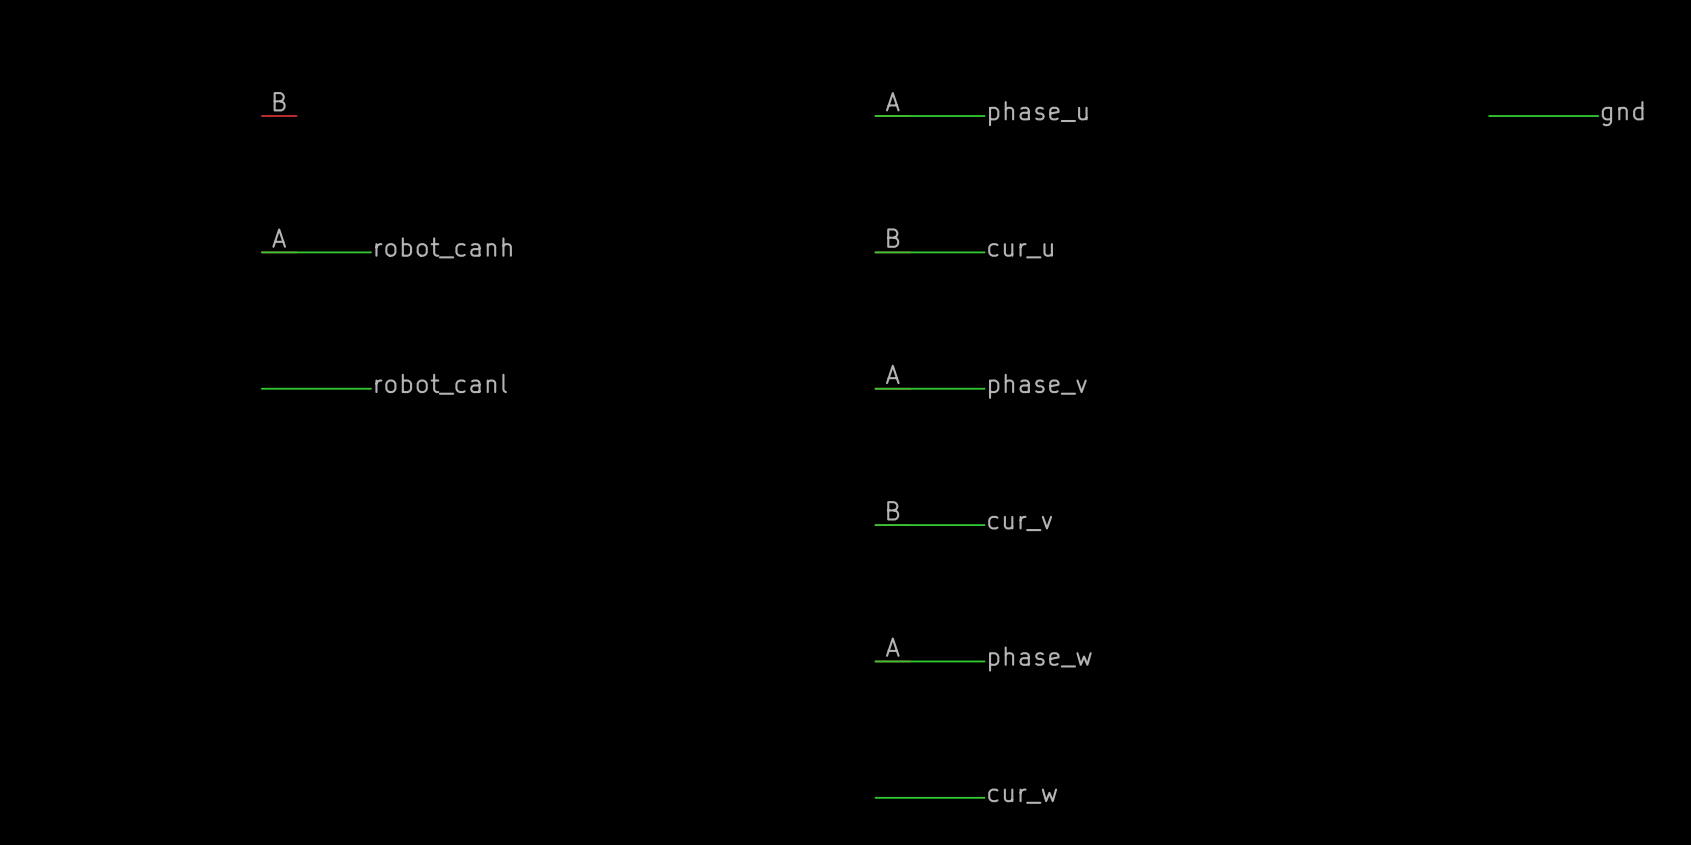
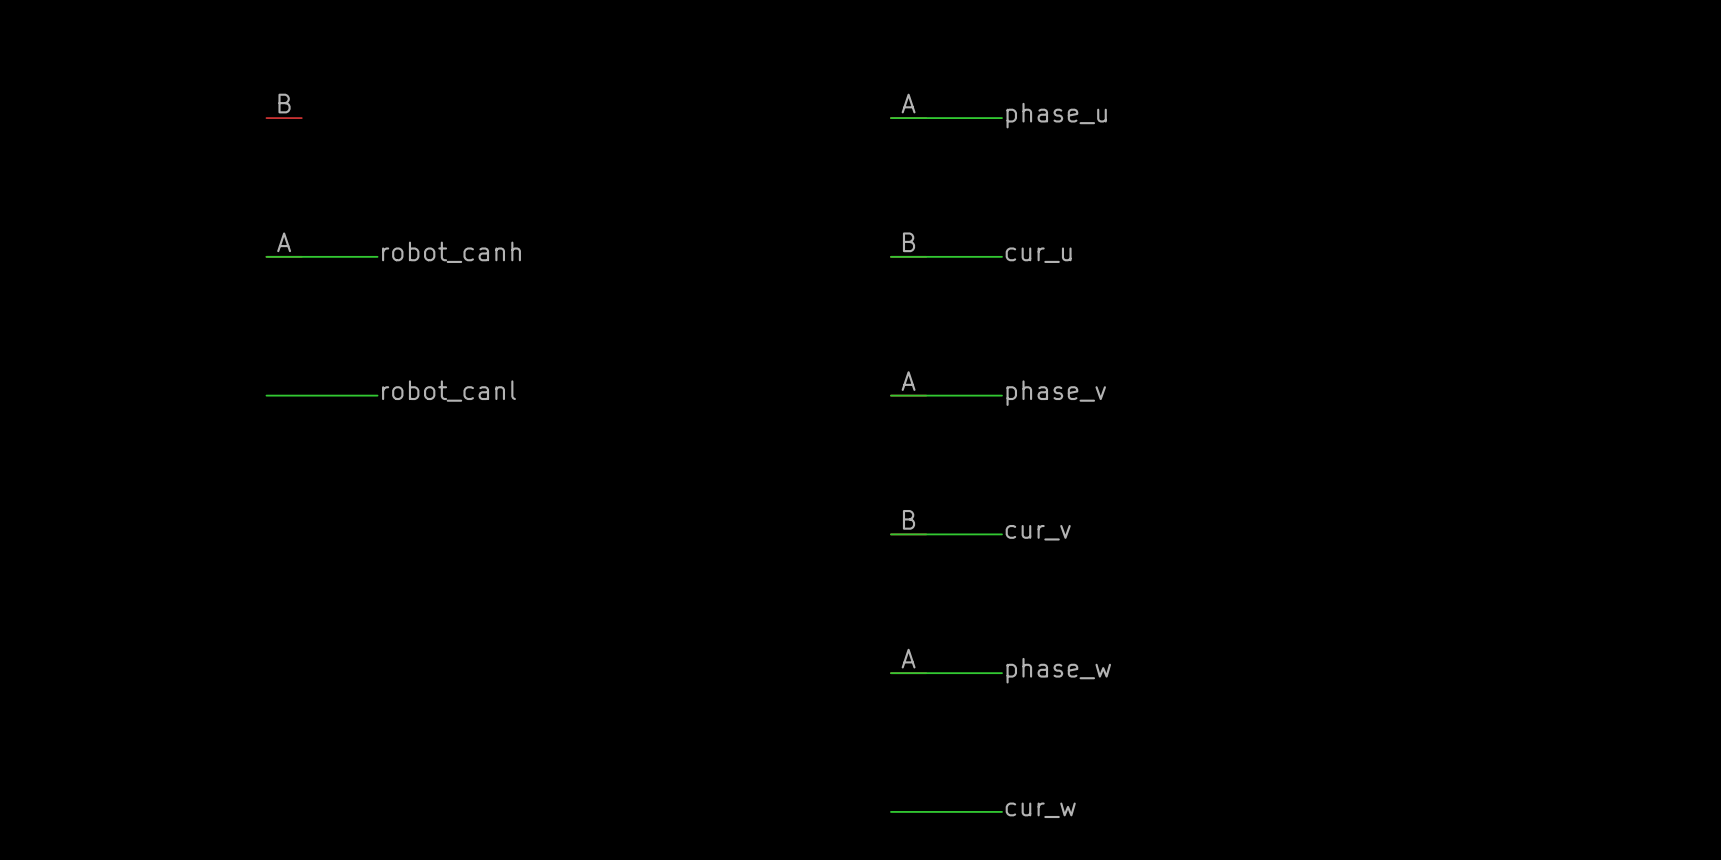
label: gnd (1622, 113) -> none
wire: (1489, 116) (1598, 116) -> none

